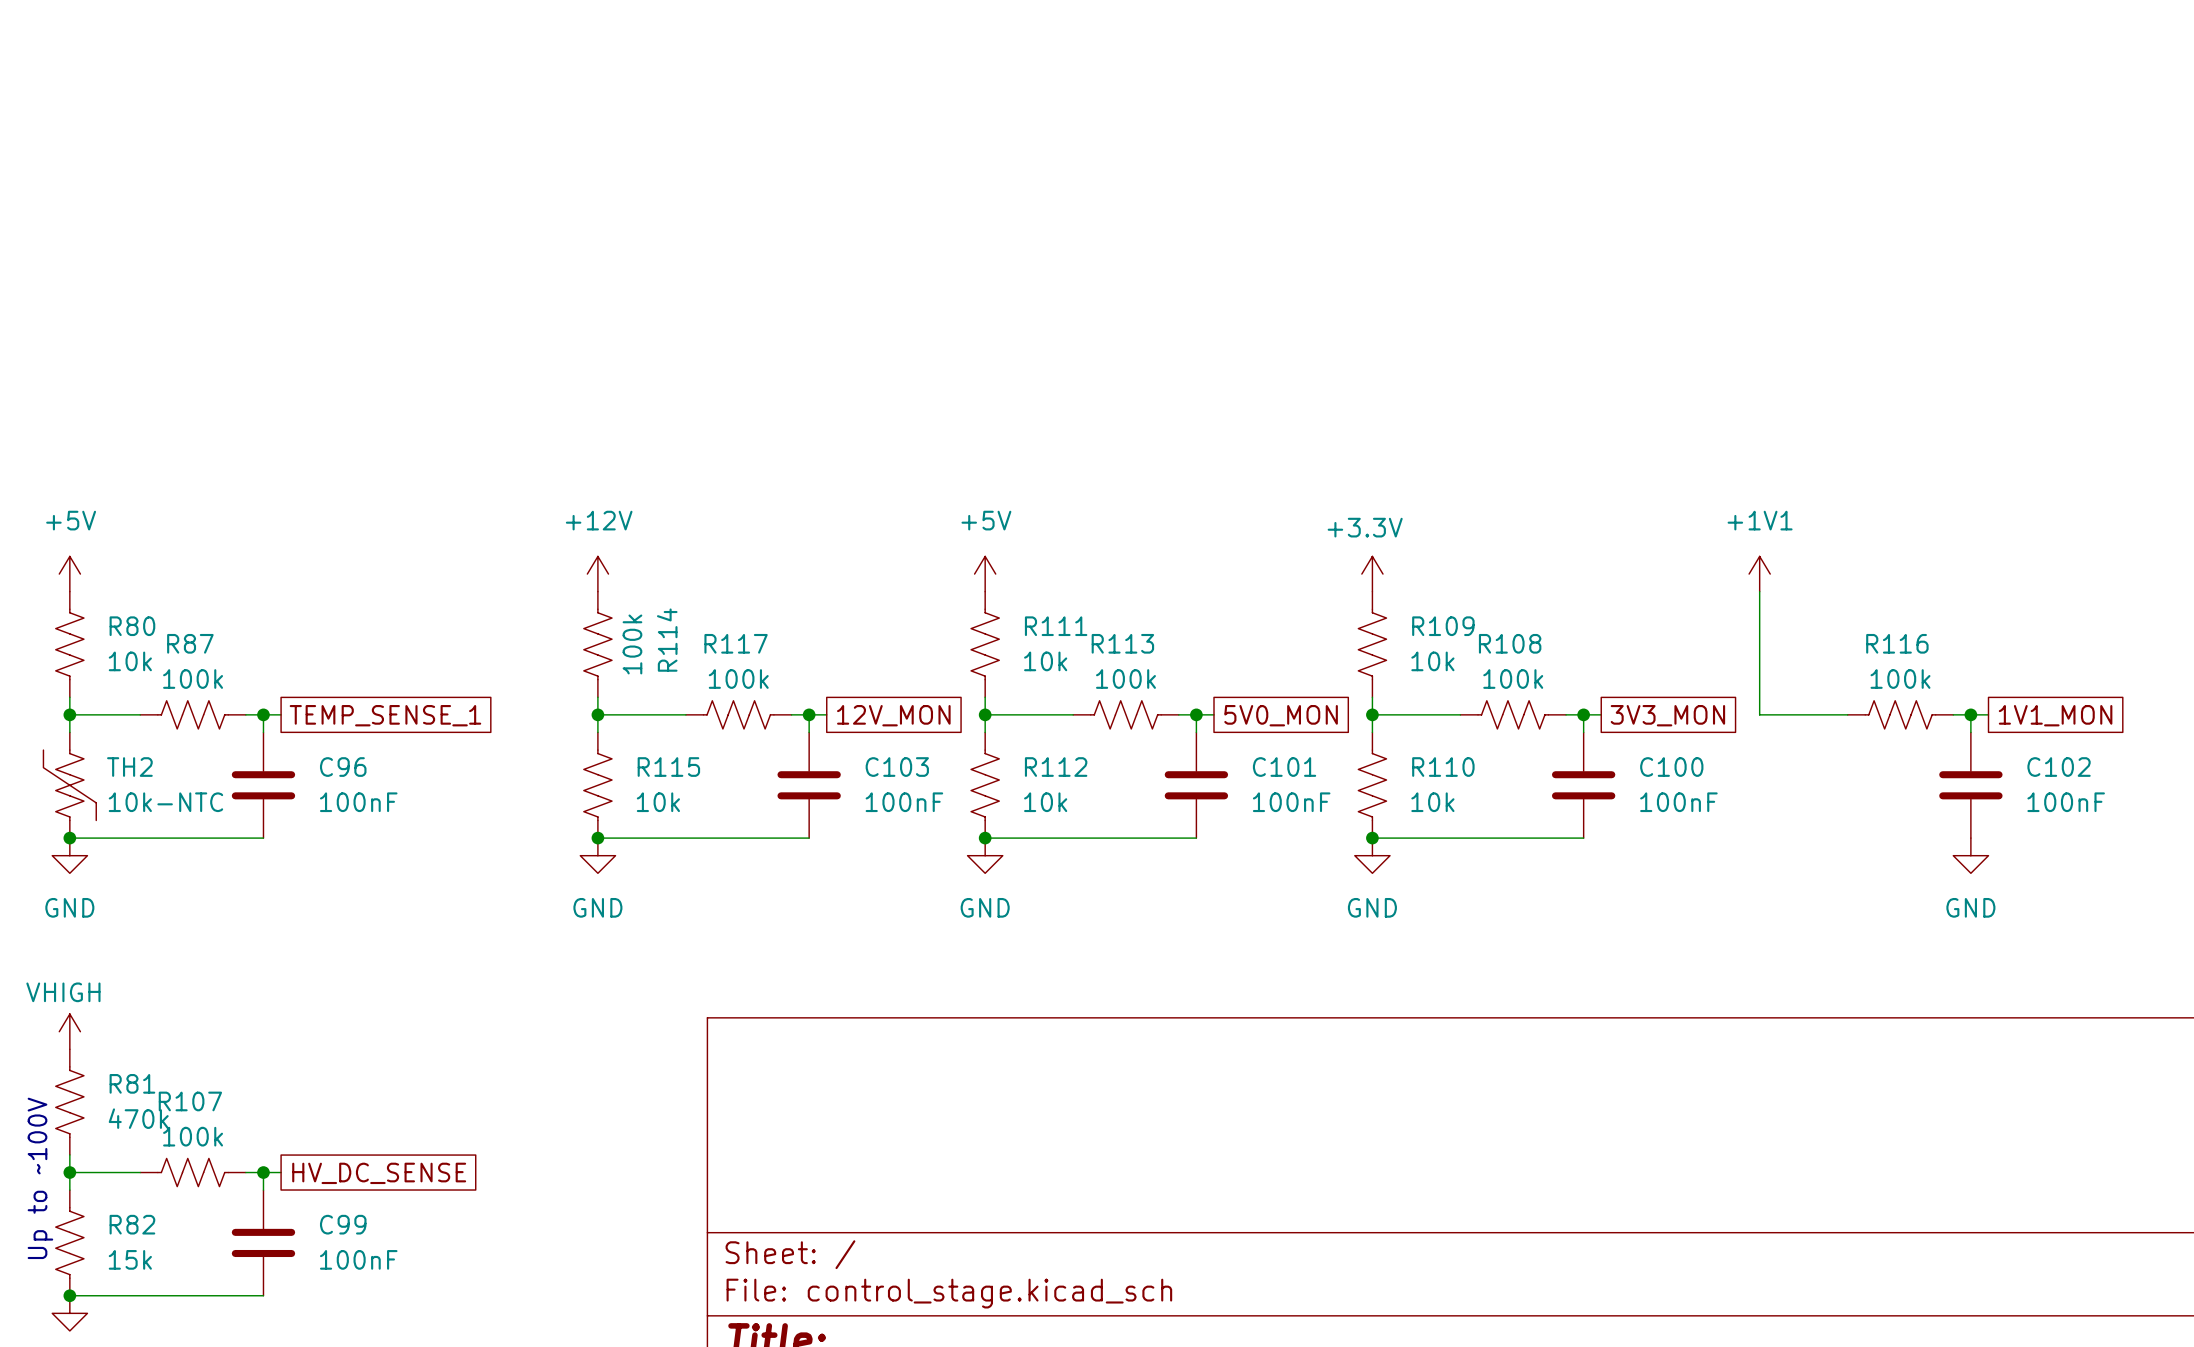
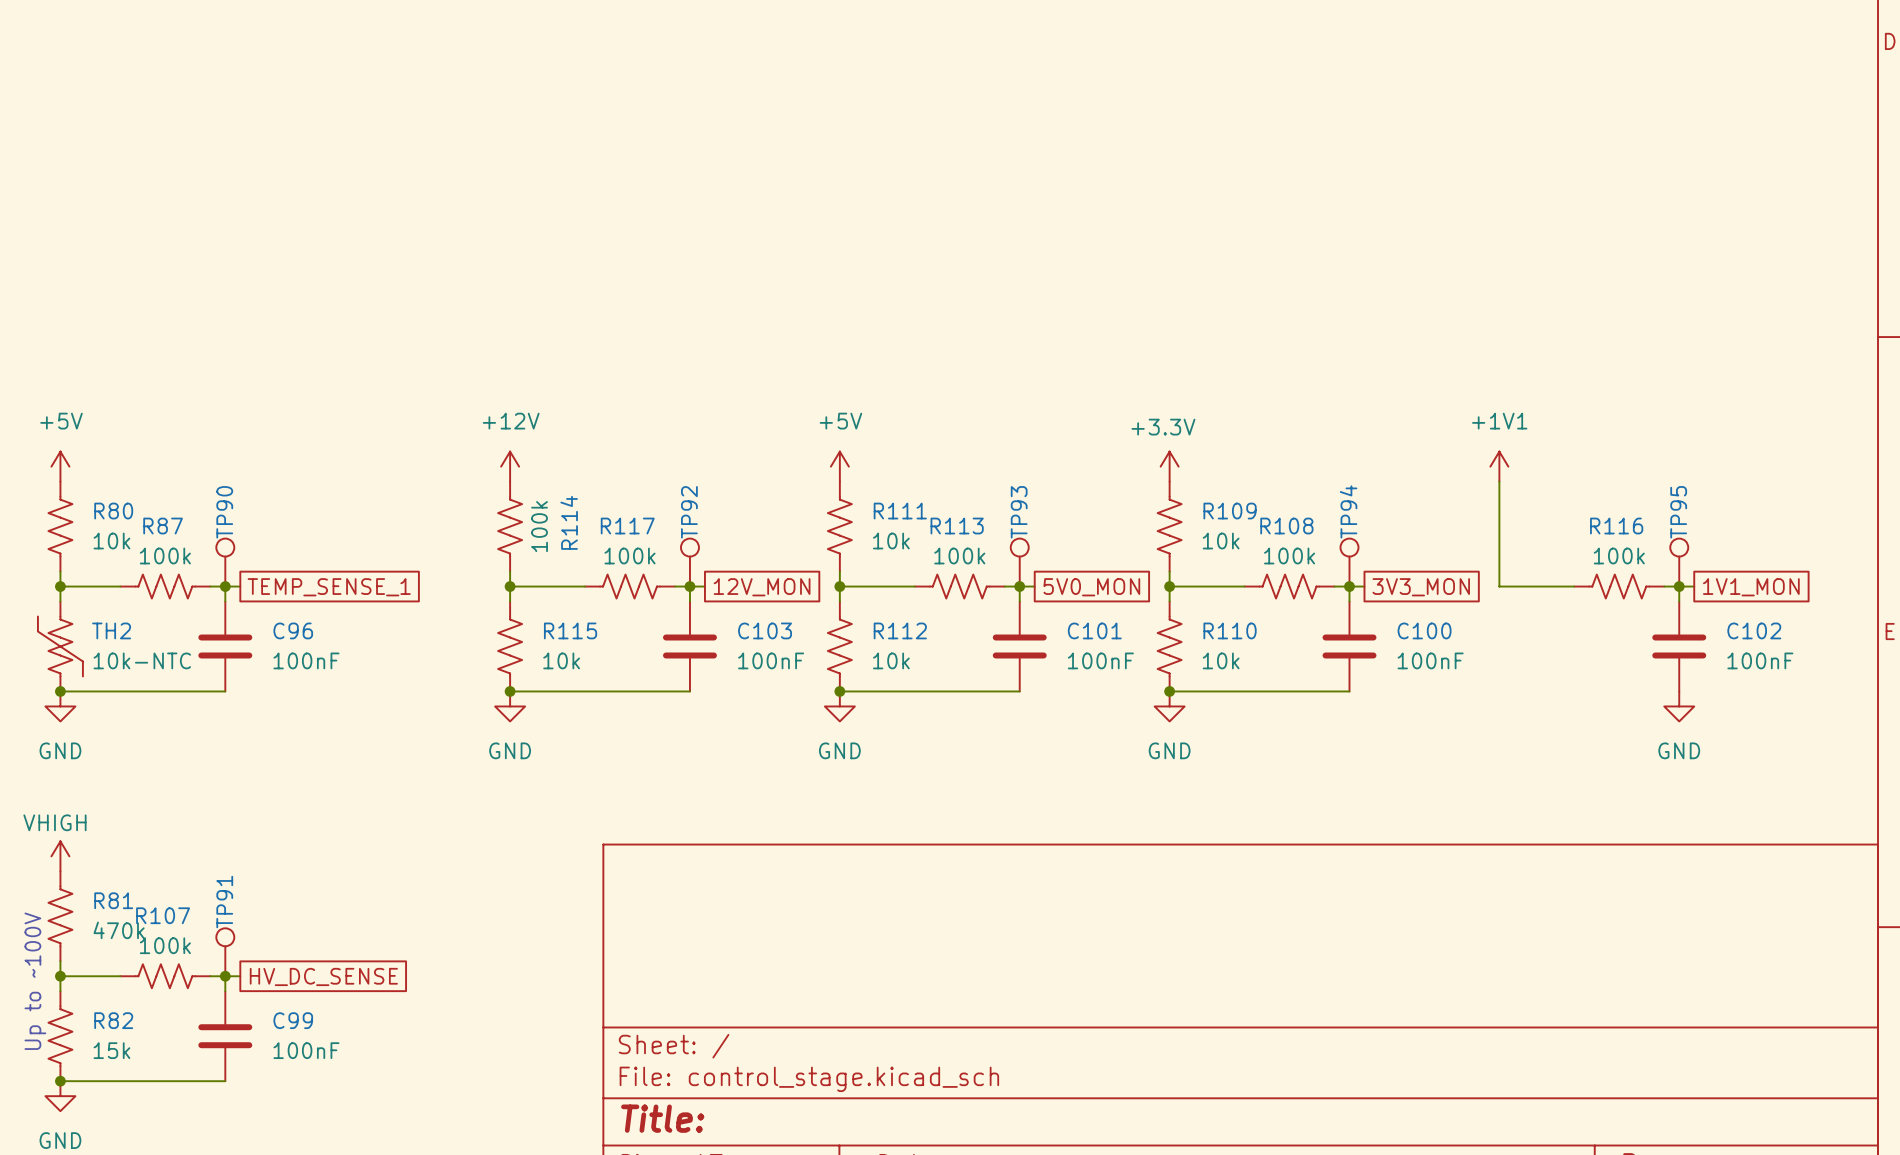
TP90: none -> (225, 562)
TP92: none -> (689, 562)
TP93: none -> (1019, 562)
TP94: none -> (1349, 562)
TP95: none -> (1679, 562)
TP91: none -> (225, 952)

